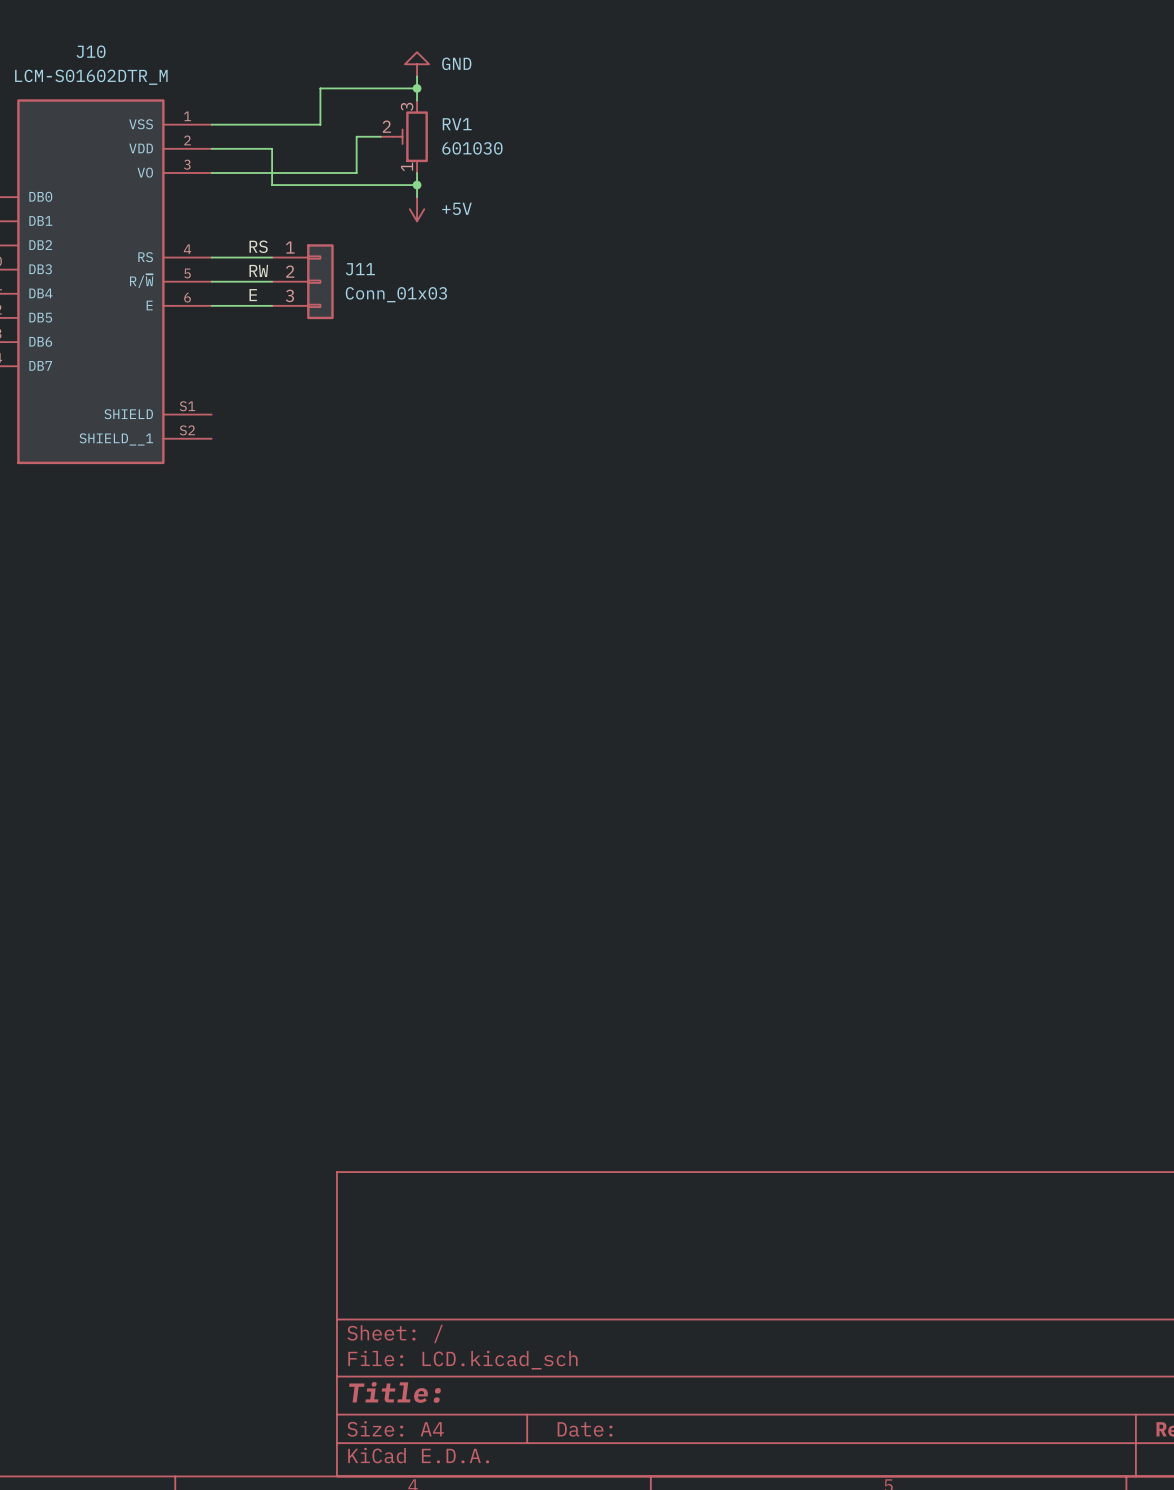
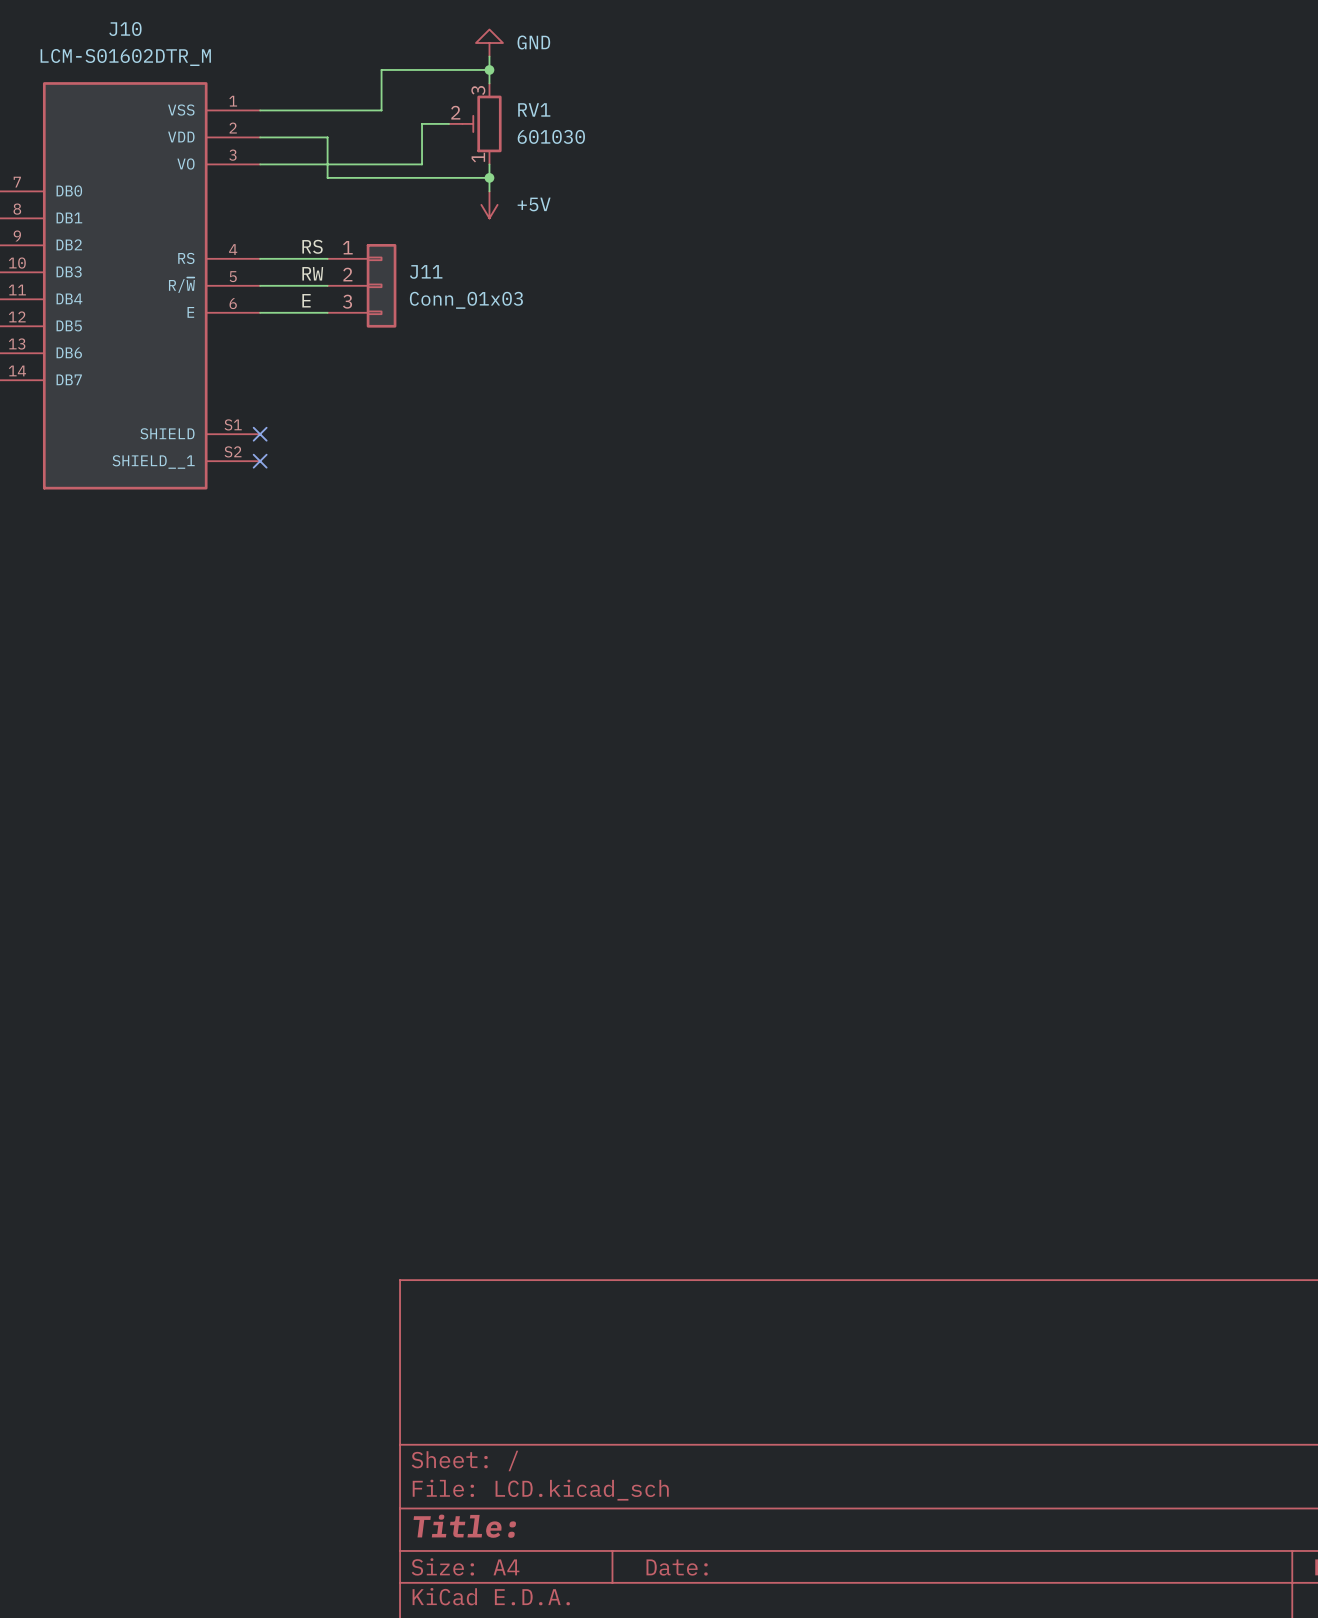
no-connect mark: none -> (260, 434)
no-connect mark: none -> (260, 461)

